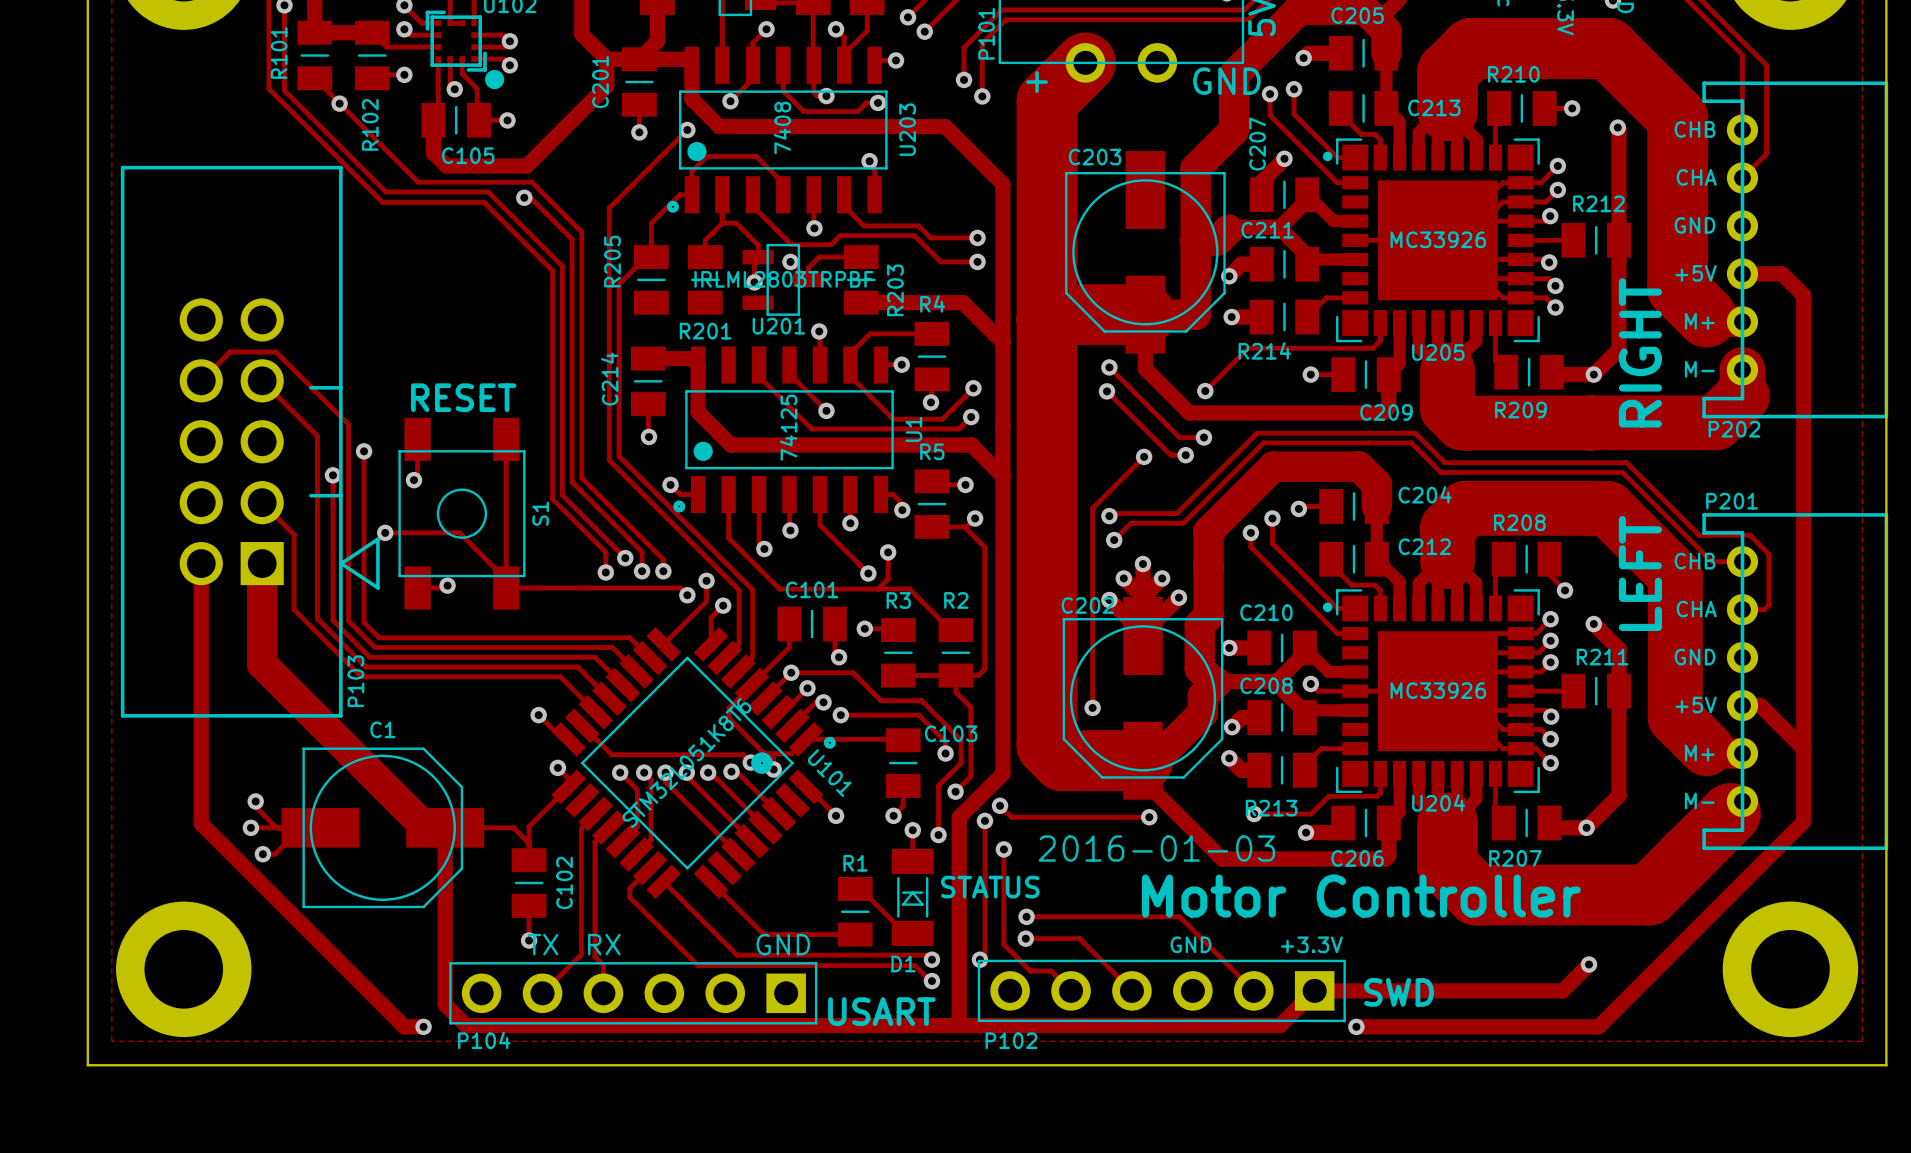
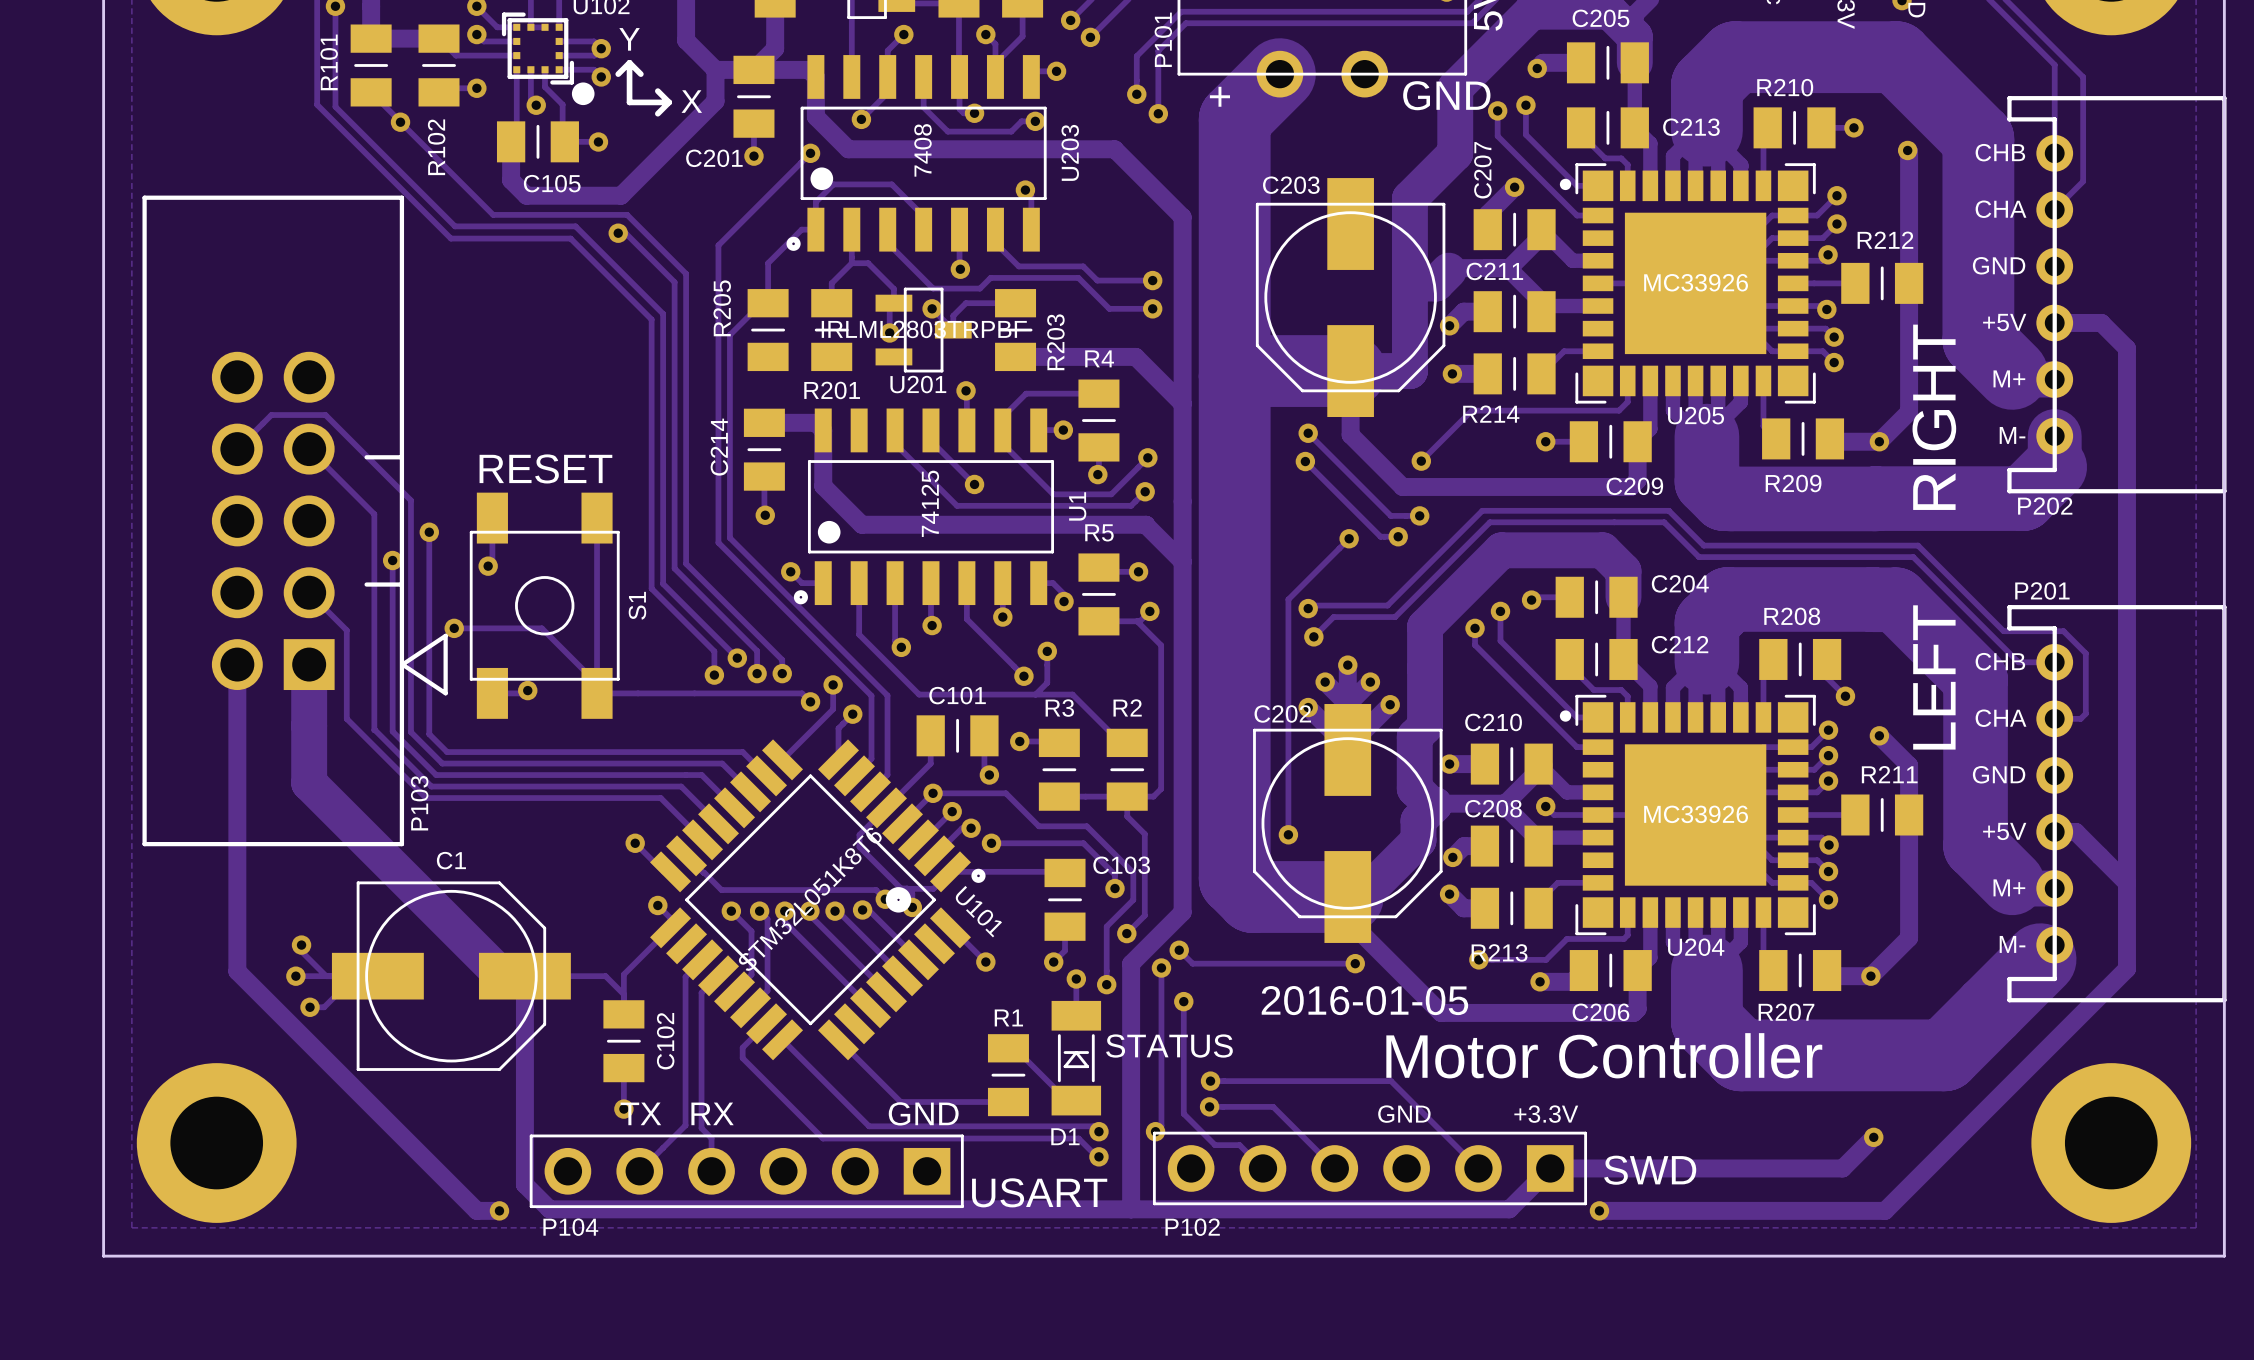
text: none -> Y (629, 39)
line: none -> (629, 62) (629, 102) (669, 102)
line: none -> (629, 62) (618, 74)
line: none -> (629, 62) (640, 74)
line: none -> (657, 91) (669, 102)
C201 name rotation: 0° (600, 82) -> 90° clockwise (714, 158)
line: none -> (669, 102) (657, 113)
text: none -> X (691, 101)
text: 2016-01-03 (1156, 848) -> 2016-01-05 (1364, 1000)

